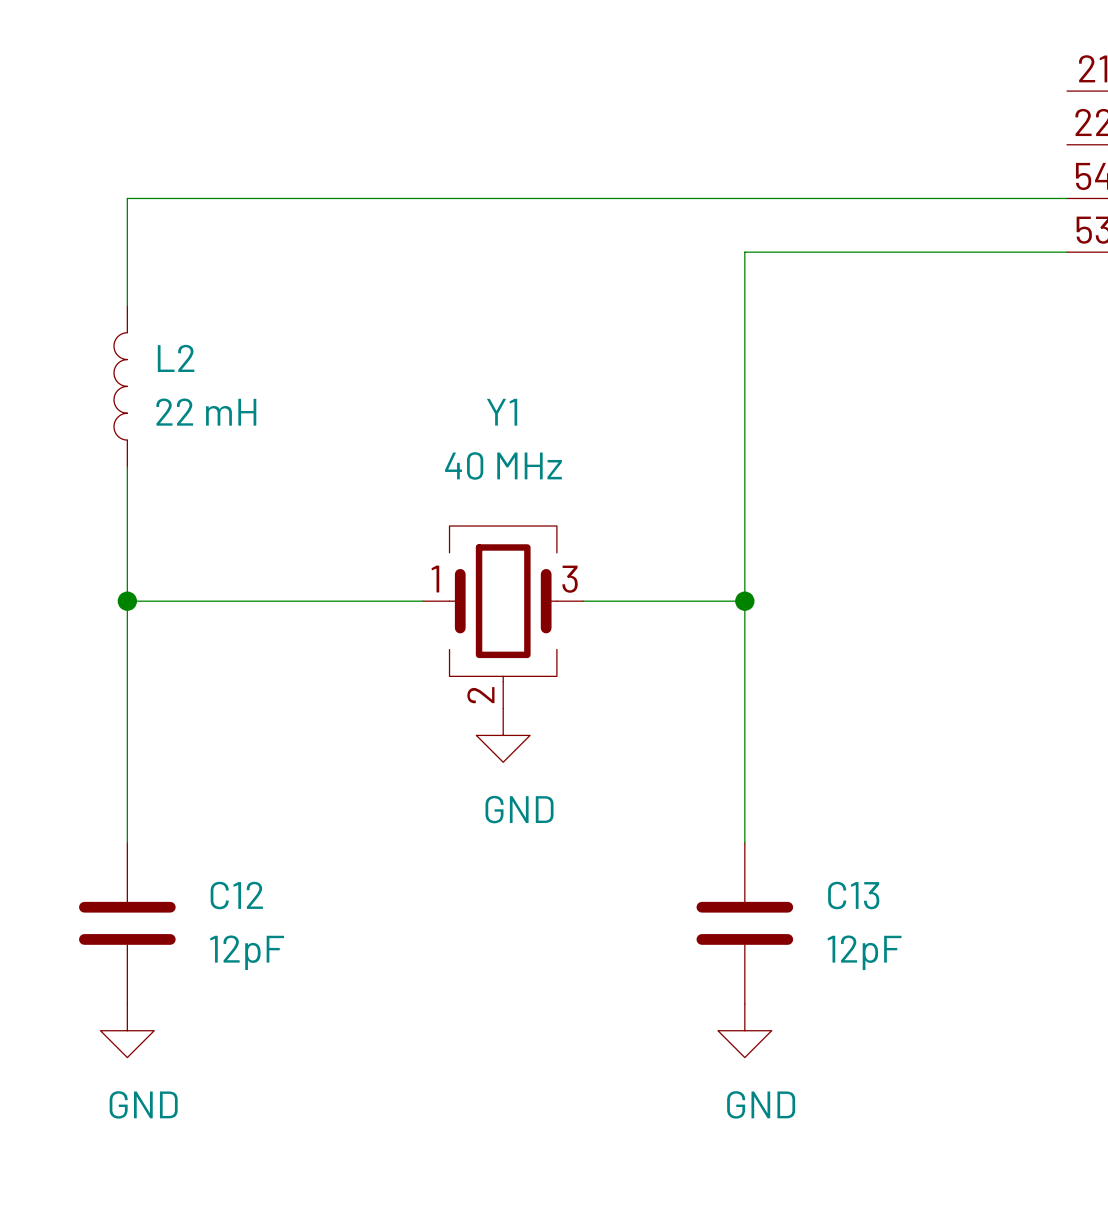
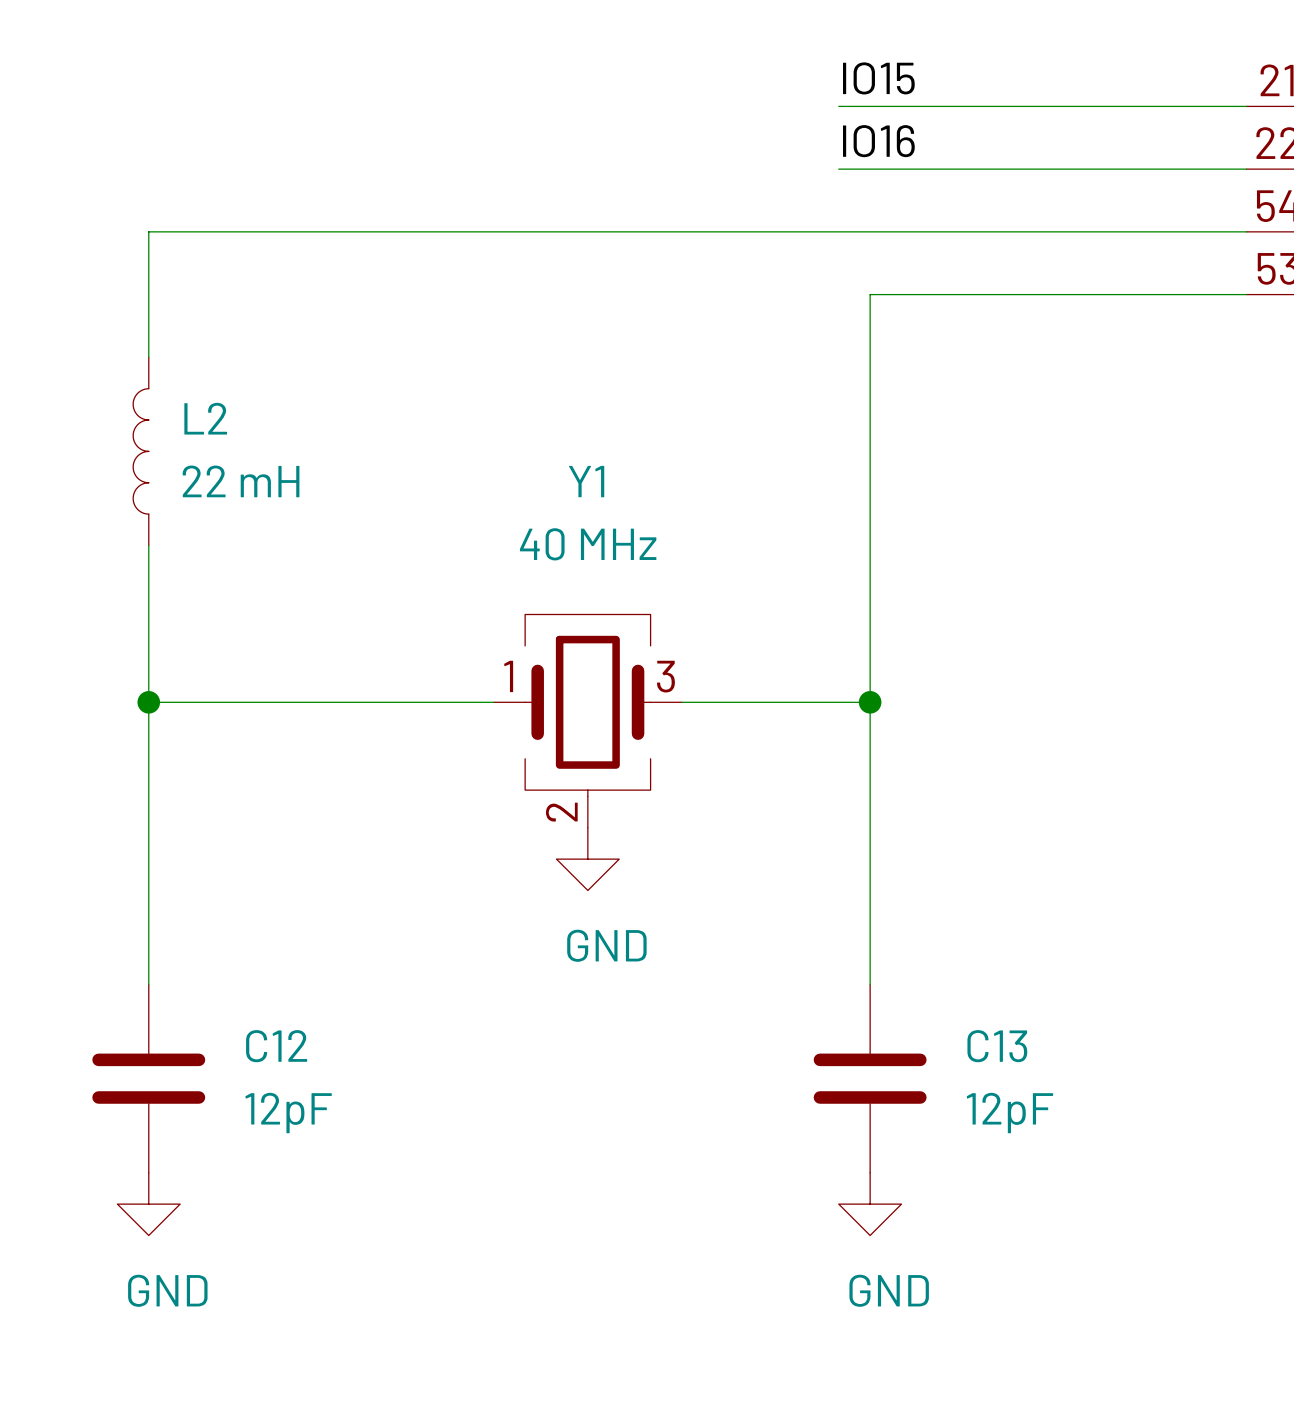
label: none -> IO15 (878, 78)
wire: none -> (838, 106) (1246, 106)
label: none -> IO16 (878, 141)
wire: none -> (838, 169) (1246, 169)

